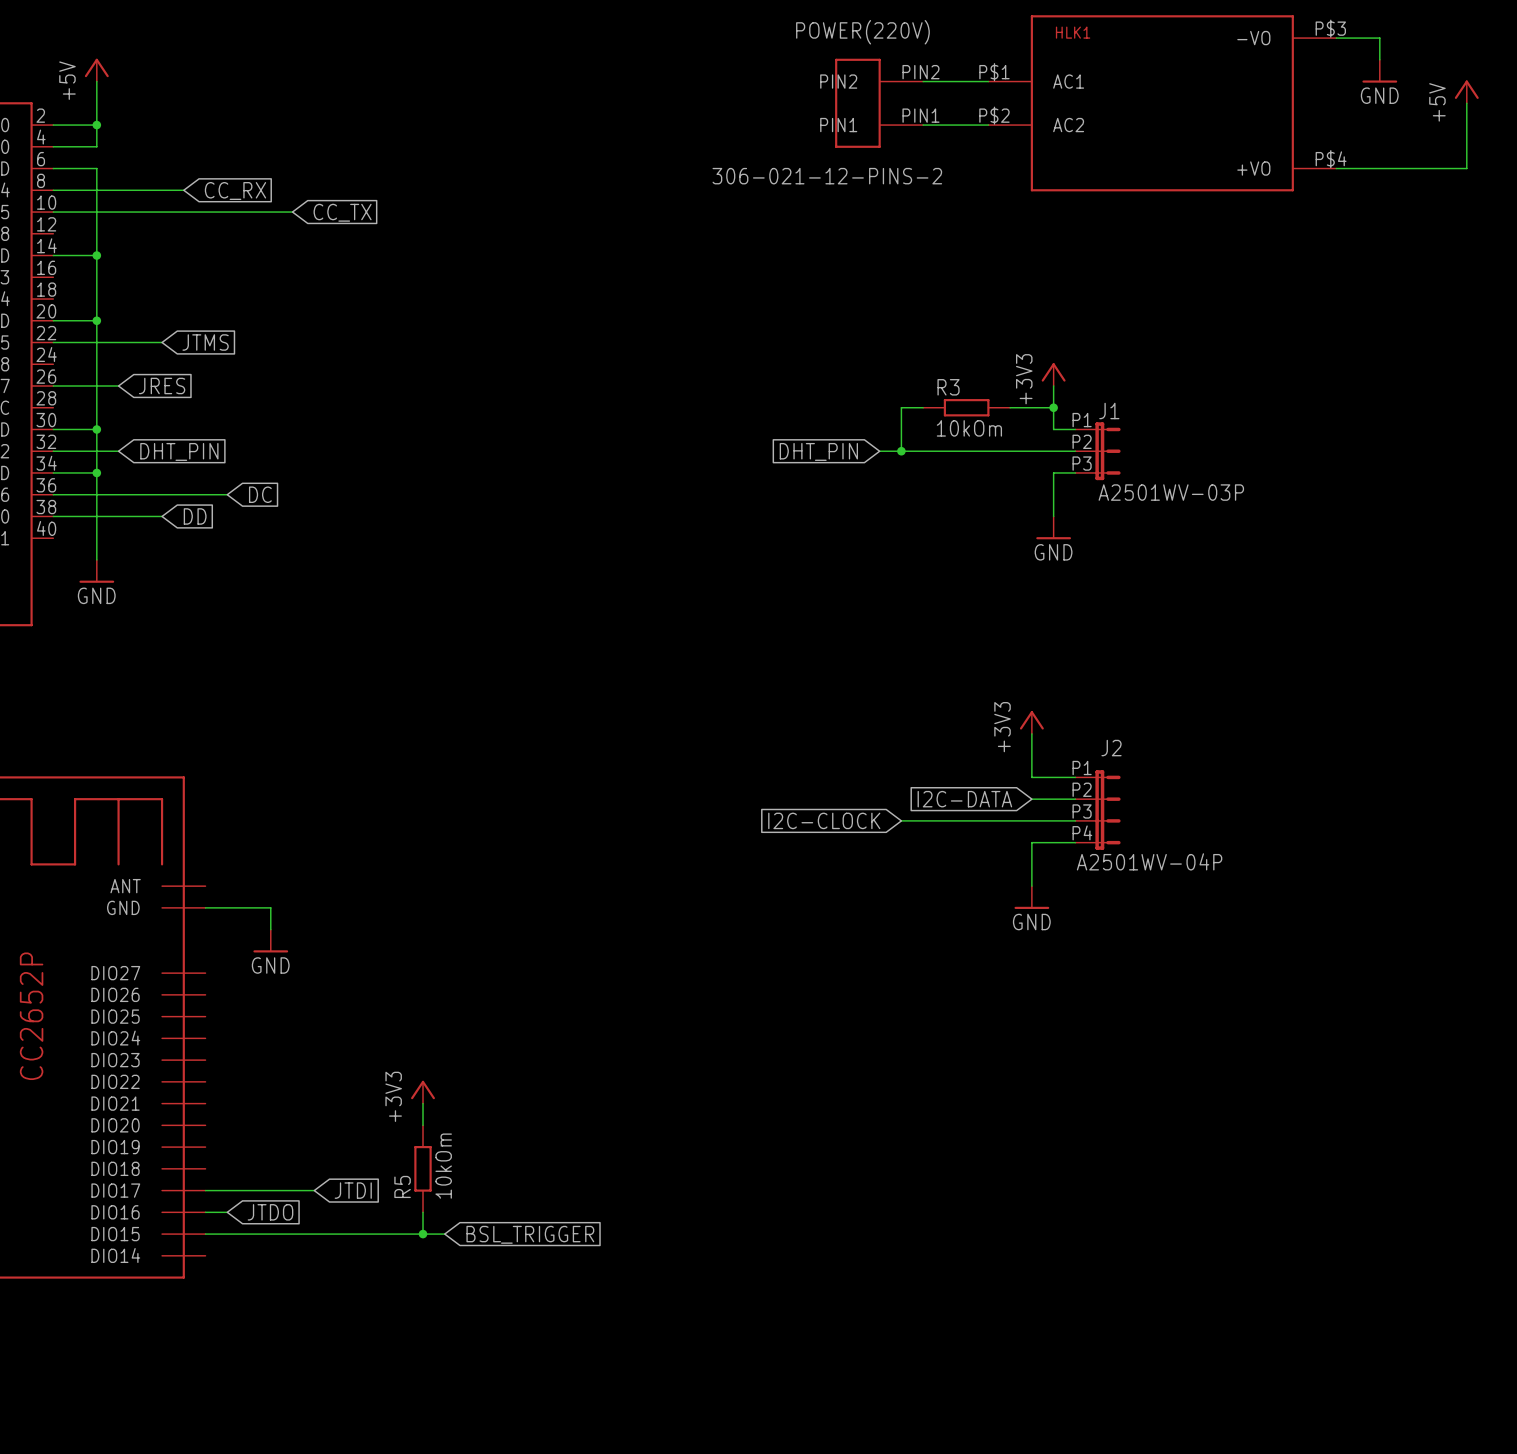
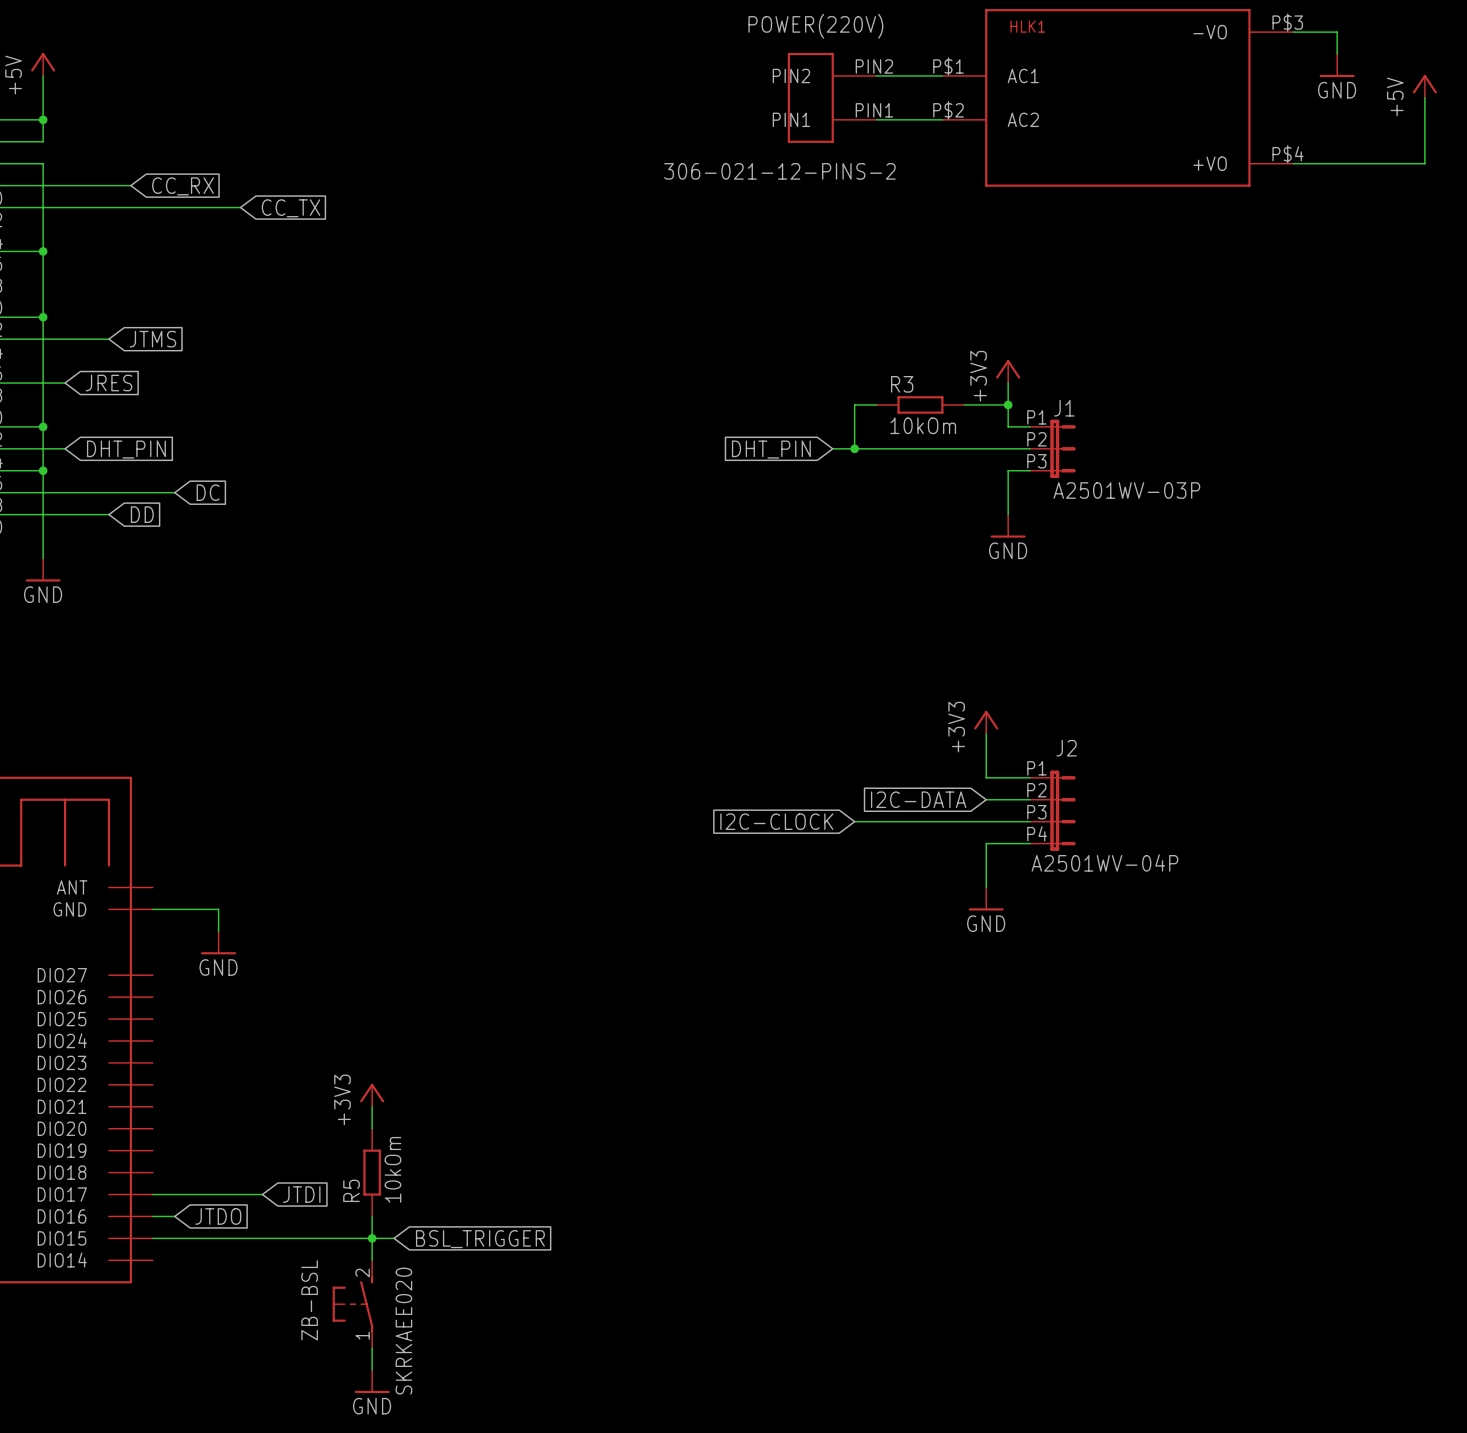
wire: none -> (372, 1238) (372, 1260)
ZB-BSL: none -> SKRKAEE020 (352, 1304)
wire: none -> (372, 1348) (372, 1369)
power symbol: none -> GND (372, 1381)

